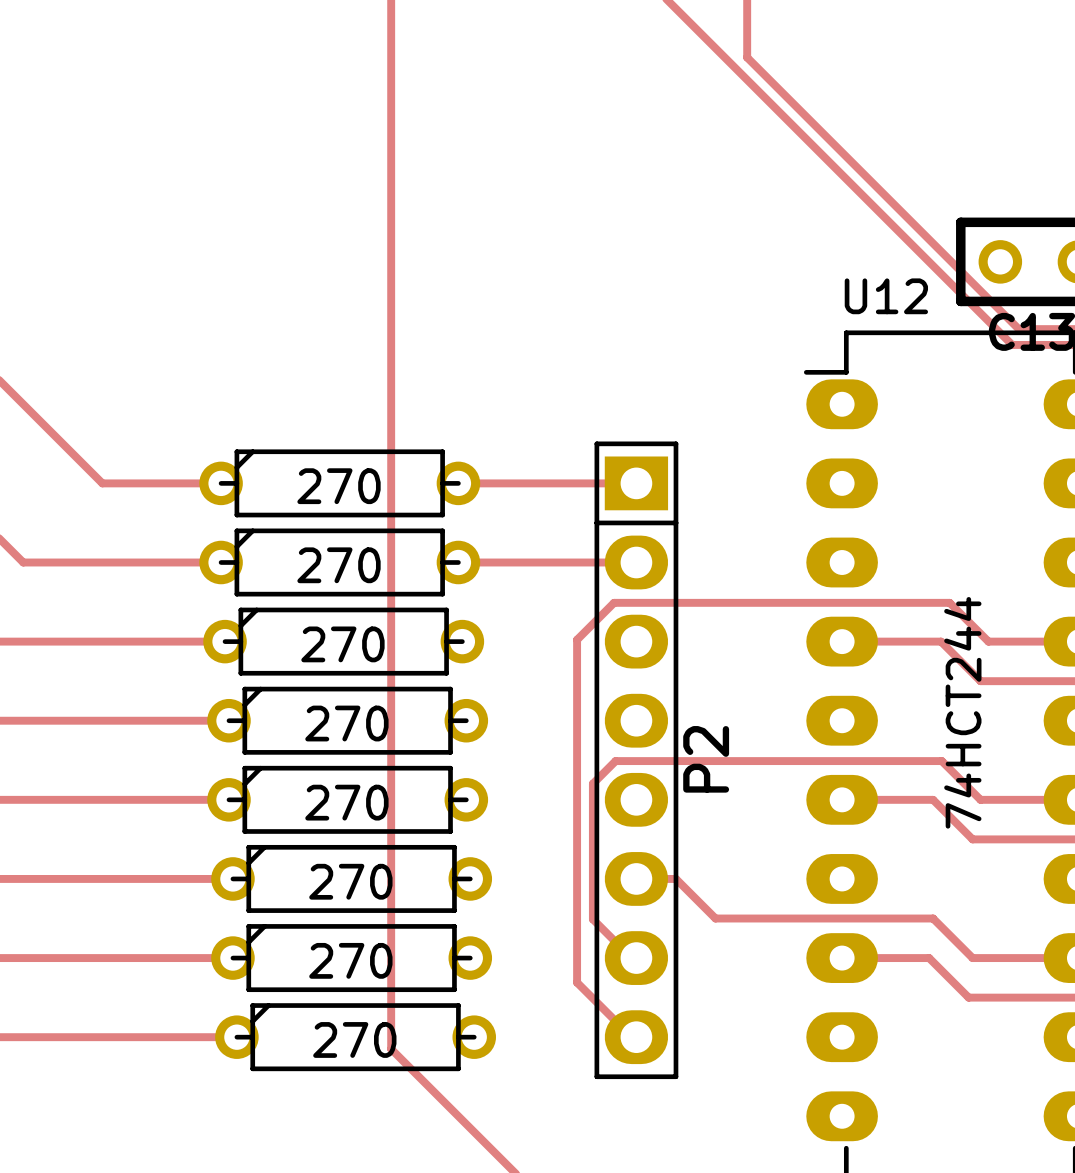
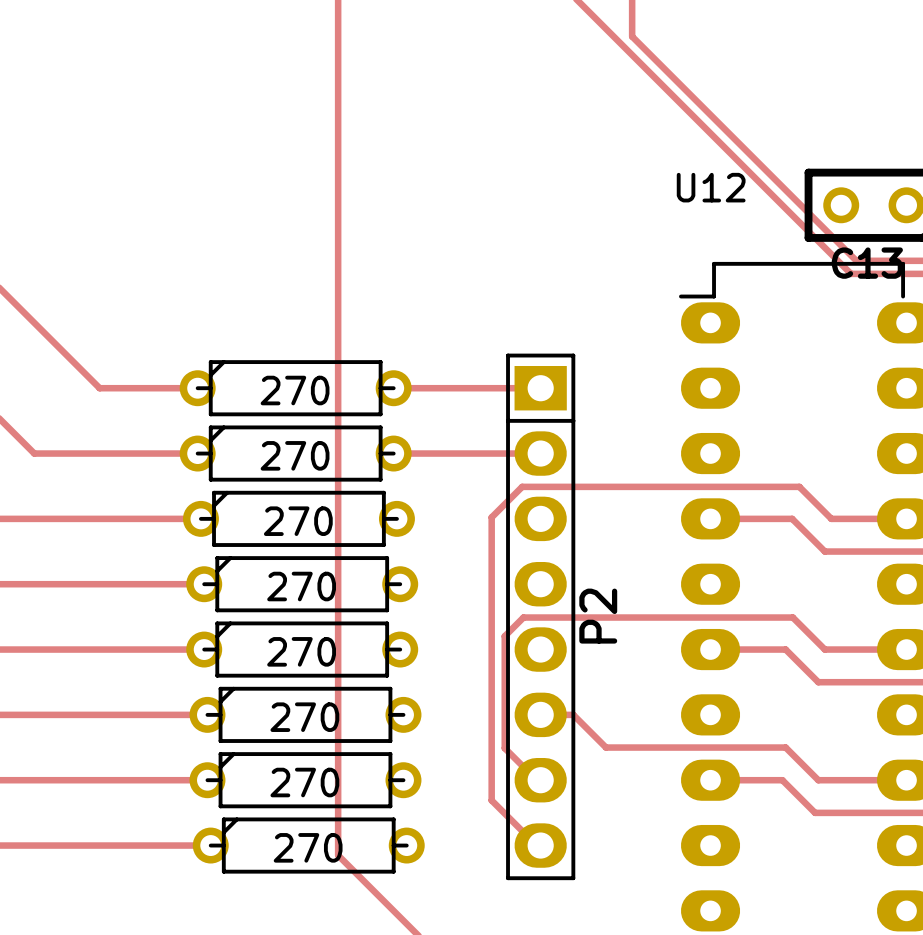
U12 name position: U12 (886, 296) -> U12 (711, 187)
U12 value: 74HCT244 (962, 712) -> none

